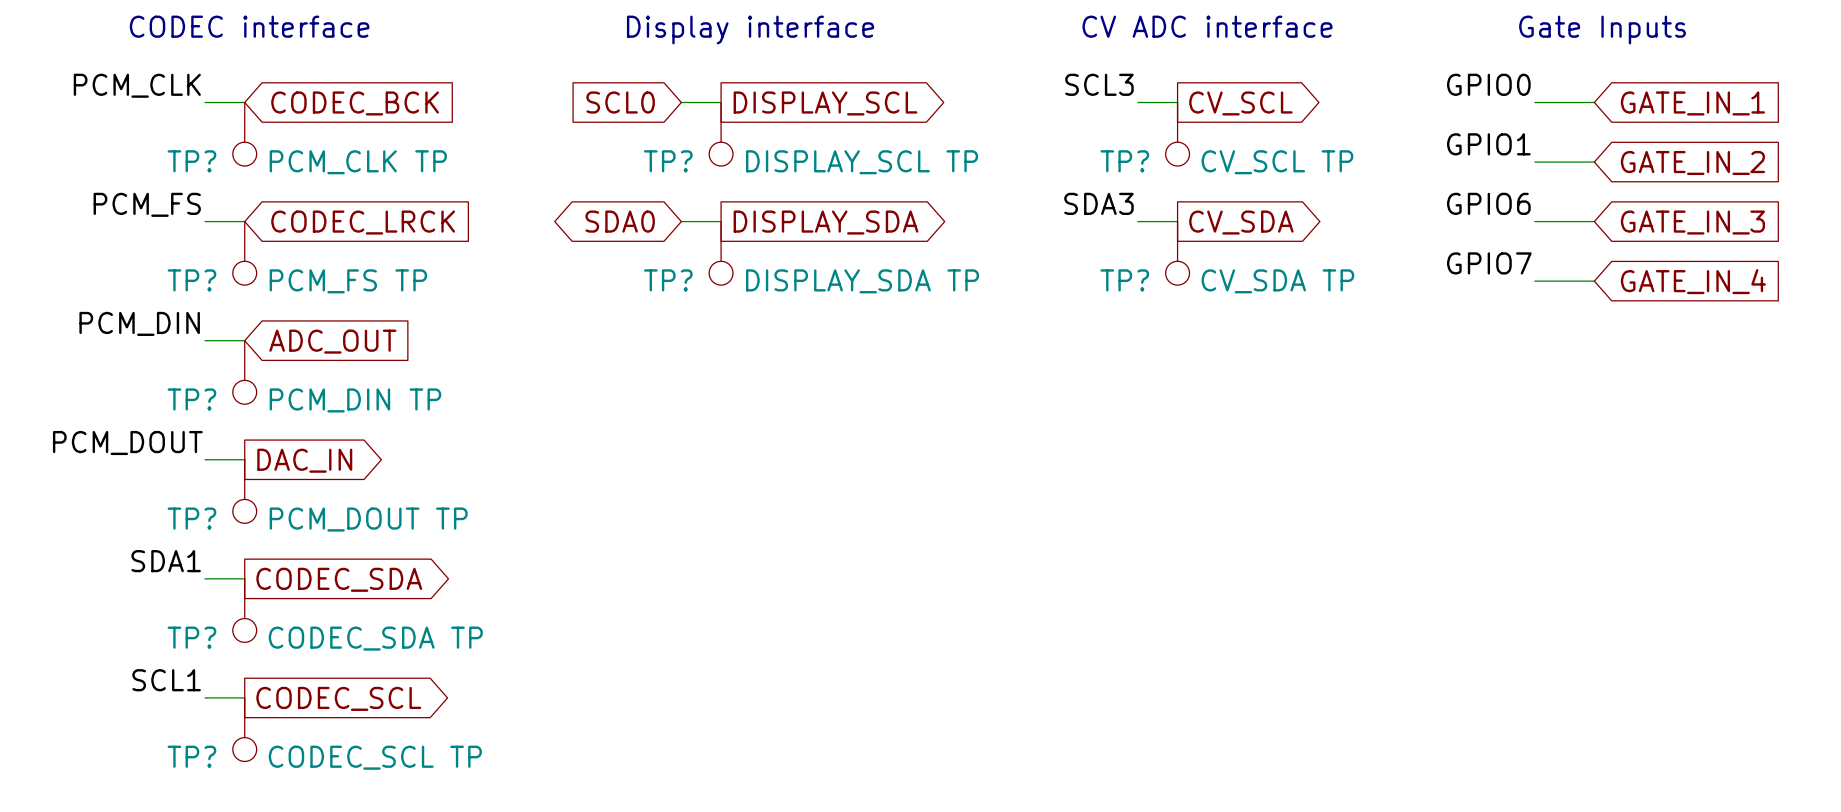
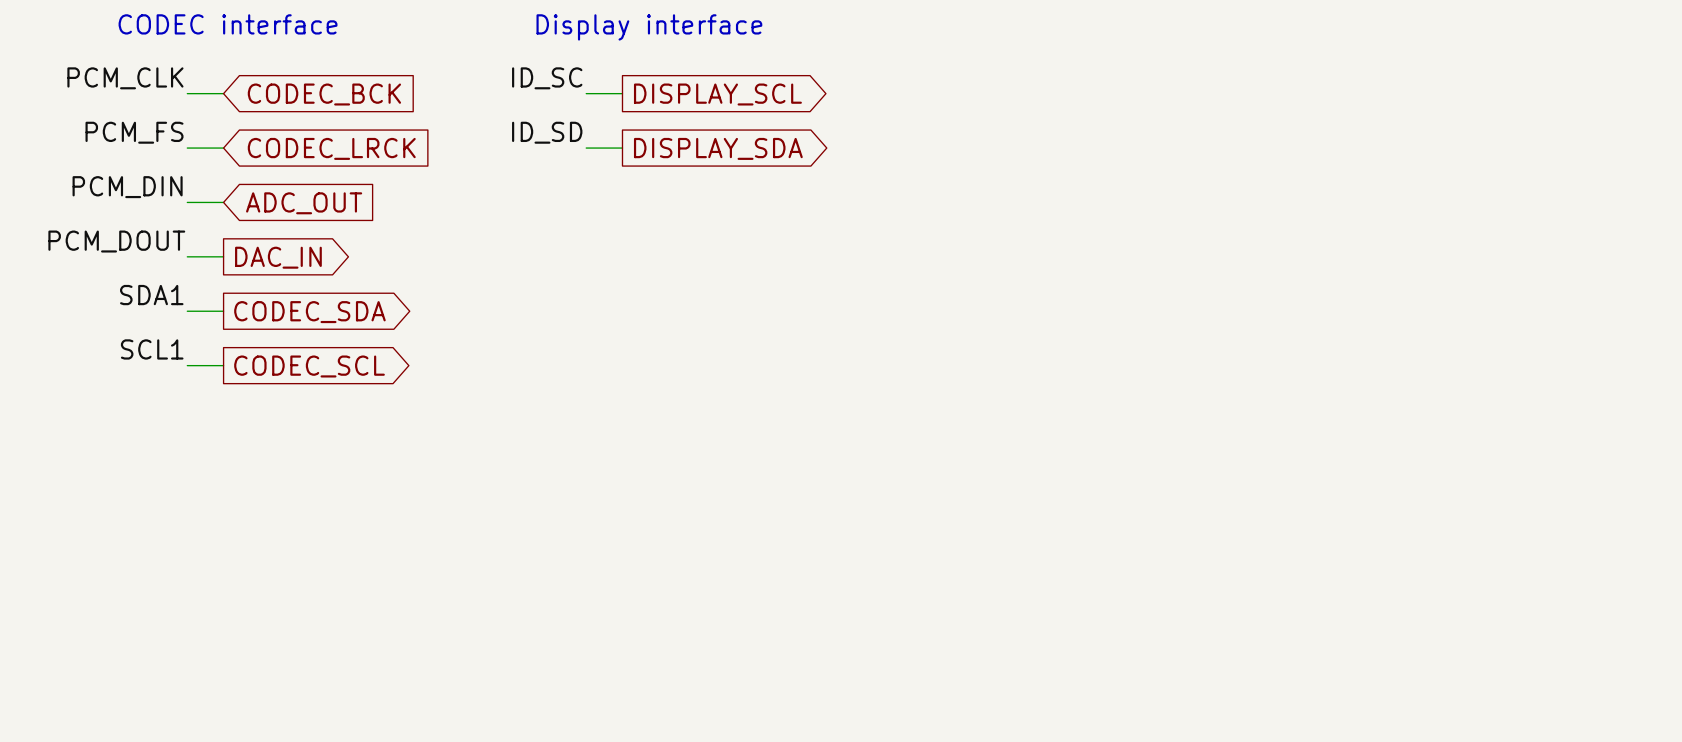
text: CV ADC interface (1207, 26) -> none
text position: Display interface (750, 30) -> Display interface (649, 27)
text: Gate Inputs (1602, 30) -> none
label: SCL3 (1099, 84) -> none
label: GPIO0 (1488, 84) -> none
label: none -> ID_SC (547, 78)
global label shape: input (620, 102) -> output (717, 94)
global label: SCL0 (620, 102) -> DISPLAY_SCL (717, 94)
wire: (681, 102) (721, 102) -> (622, 93) (586, 93)
wire: (1137, 102) (1177, 102) -> none
wire: (1534, 102) (1594, 102) -> none
global label: DISPLAY_SCL (825, 103) -> none
global label: CV_SCL (1240, 103) -> none
global label: GATE_IN_1 (1692, 103) -> none
TP?: PCM_CLK TP (244, 134) -> none
TP?: DISPLAY_SCL TP (721, 134) -> none
TP?: CV_SCL TP (1177, 134) -> none
label: GPIO1 (1488, 144) -> none
label: none -> PCM_FS (134, 132)
label: none -> ID_SD (547, 132)
global label: none -> CODEC_LRCK (331, 148)
wire: (1534, 162) (1594, 162) -> none
global label: GATE_IN_2 (1692, 162) -> none
label: SDA3 (1098, 203) -> none
label: GPIO6 (1488, 203) -> none
label: PCM_FS (147, 204) -> PCM_DIN (127, 187)
global label: SDA0 (620, 221) -> none
wire: (681, 221) (721, 221) -> (586, 148) (622, 148)
wire: (1137, 221) (1177, 221) -> none
wire: (1534, 221) (1594, 221) -> none
global label: CODEC_LRCK (363, 222) -> ADC_OUT (304, 203)
global label position: DISPLAY_SDA (826, 222) -> DISPLAY_SDA (718, 148)
global label: CV_SDA (1241, 222) -> none
global label: GATE_IN_3 (1692, 222) -> none
TP?: PCM_FS TP (244, 253) -> none
TP?: DISPLAY_SDA TP (721, 253) -> none
TP?: CV_SDA TP (1177, 253) -> none
label: GPIO7 (1489, 263) -> none
wire: (1534, 281) (1594, 281) -> none
global label: GATE_IN_4 (1693, 281) -> none
label: PCM_DIN (139, 323) -> SDA1 (151, 295)
global label shape: input (332, 341) -> output (309, 312)
global label: ADC_OUT (332, 341) -> CODEC_SDA (309, 312)
TP?: PCM_DIN TP (244, 372) -> none
label position: PCM_DOUT (127, 443) -> PCM_DOUT (116, 241)
wire: (205, 459) (244, 459) -> (187, 148) (223, 148)
global label position: DAC_IN (304, 460) -> DAC_IN (278, 257)
TP?: PCM_DOUT TP (244, 491) -> none
label: SDA1 (166, 561) -> none
wire: (205, 578) (244, 578) -> (187, 256) (223, 256)
global label: CODEC_SDA (339, 579) -> none
TP?: CODEC_SDA TP (244, 610) -> none
label position: SCL1 (166, 680) -> SCL1 (152, 349)
wire: (205, 697) (244, 697) -> (187, 365) (223, 365)
global label position: CODEC_SCL (338, 698) -> CODEC_SCL (309, 366)
TP?: CODEC_SCL TP (244, 729) -> none

